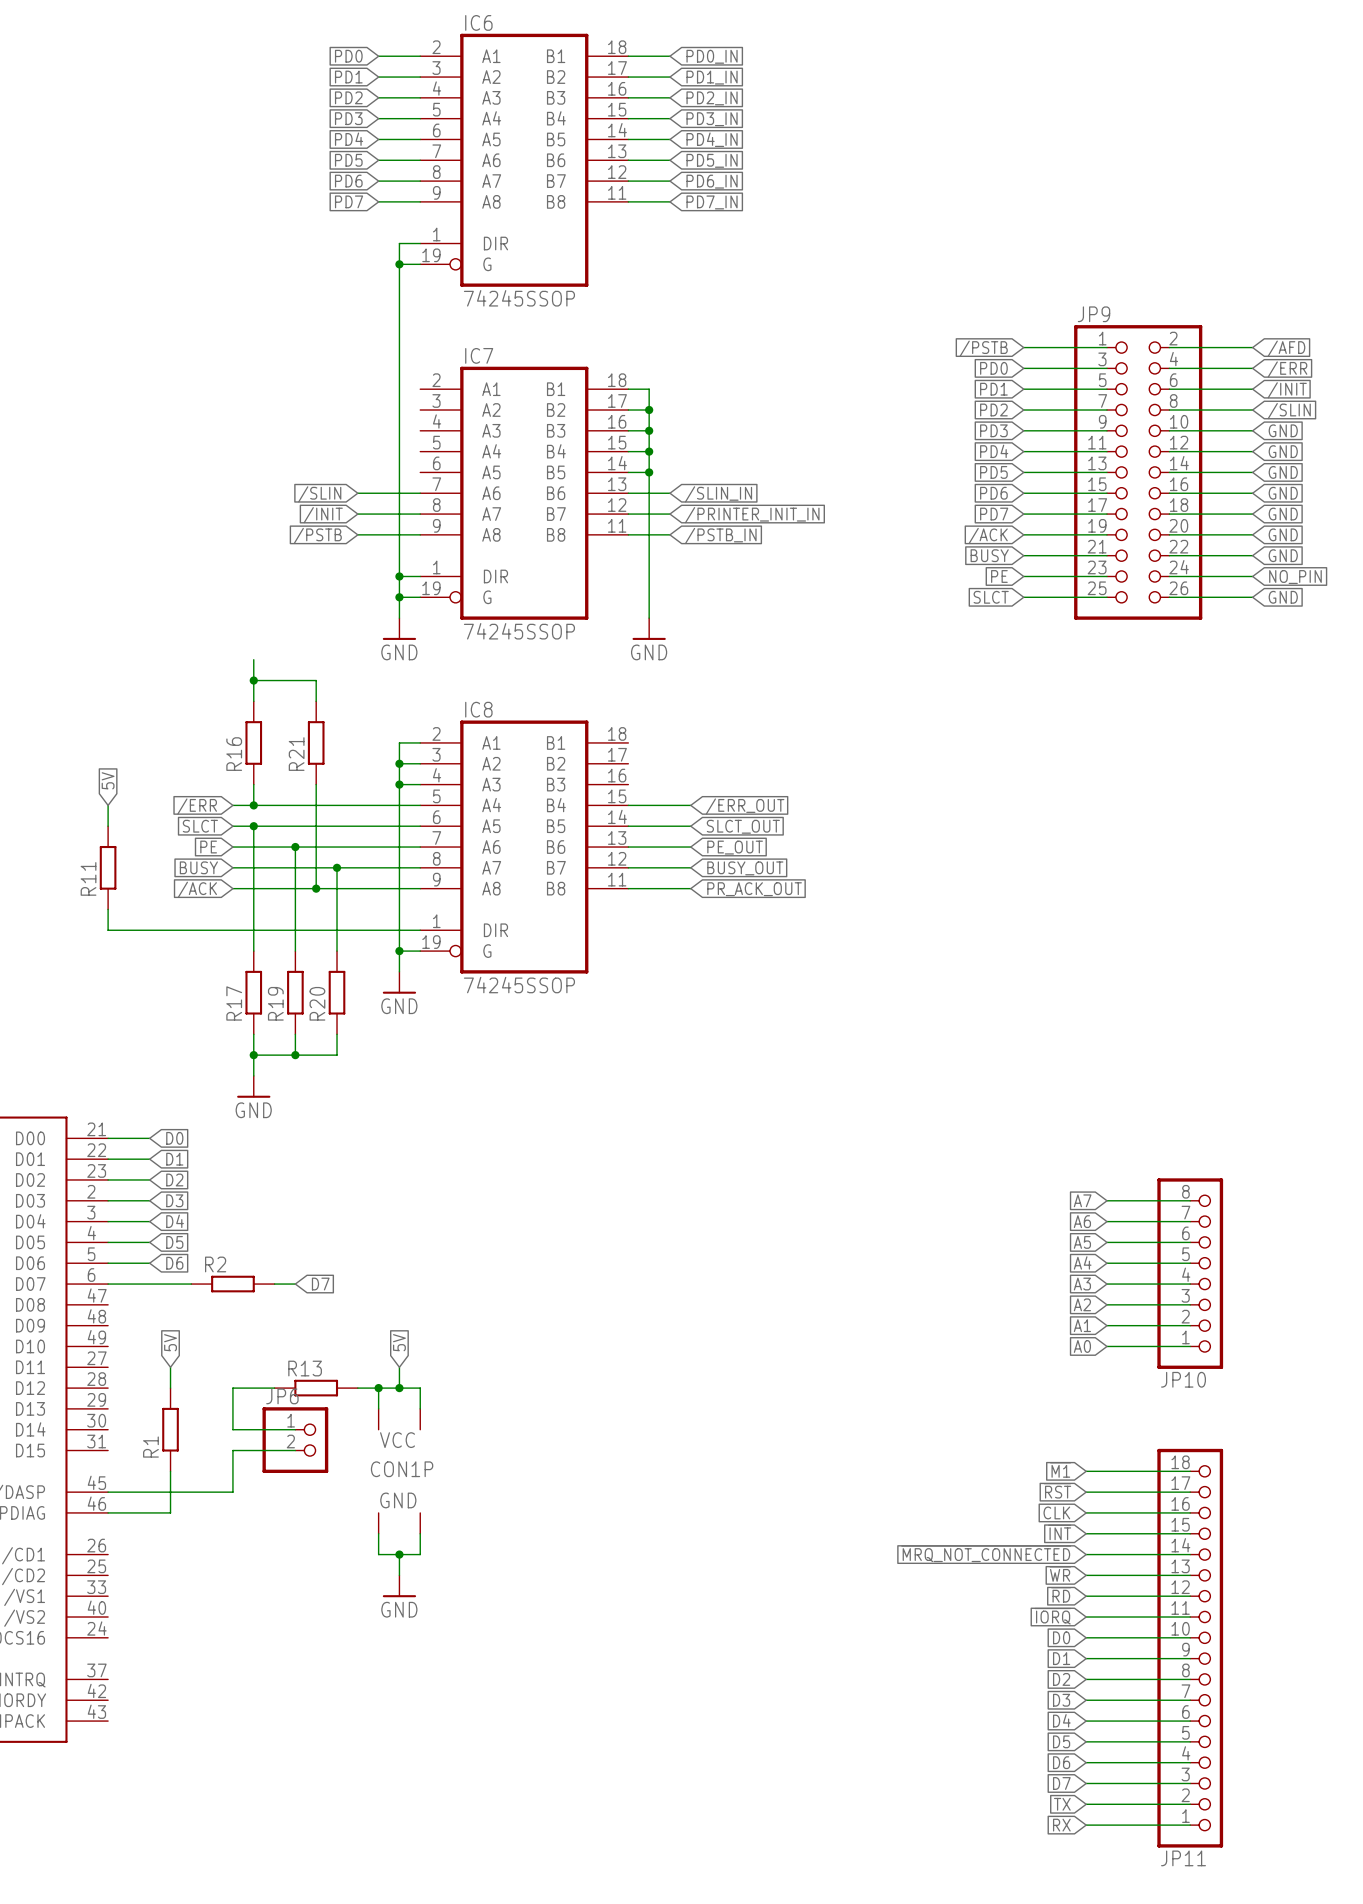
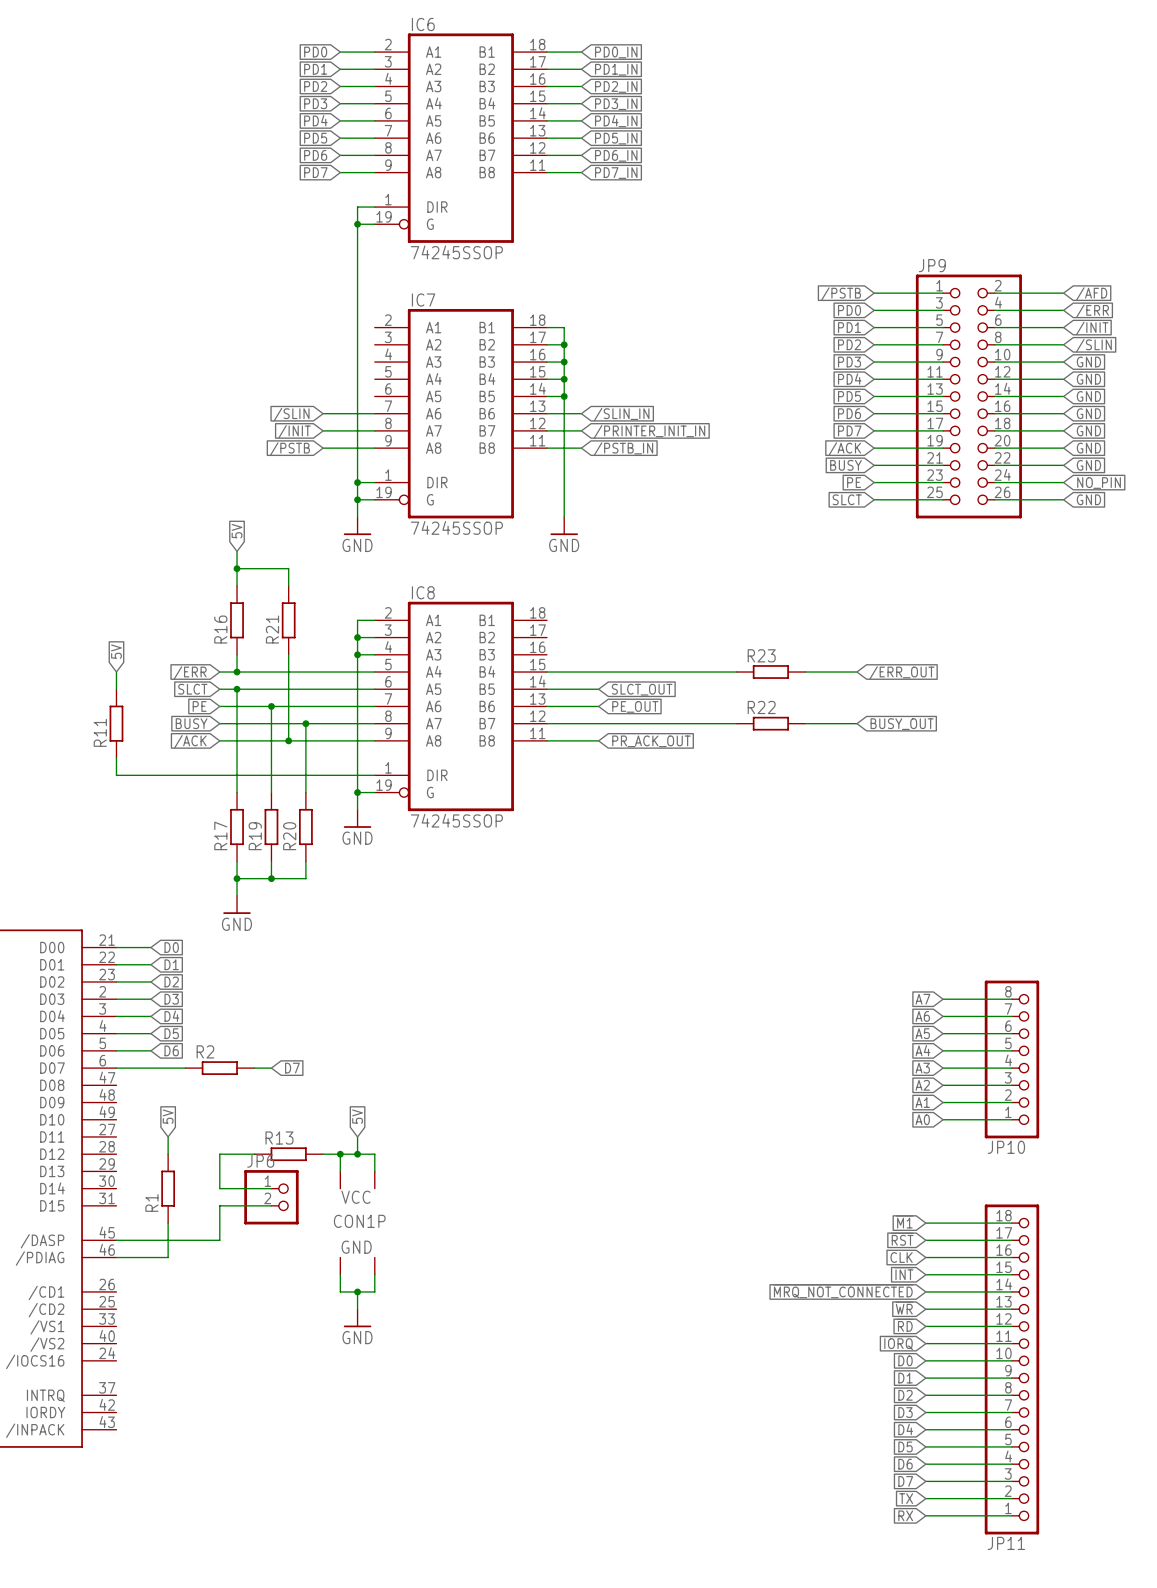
global label: none -> 5V (237, 531)
wire: none -> (598, 672) (736, 672)
R23: none -> (770, 672)
wire: none -> (805, 672) (856, 672)
global label: /ERR_OUT (745, 806) -> none
global label: none -> /ERR_OUT (901, 672)
wire: none -> (598, 723) (736, 723)
R22: none -> (770, 723)
wire: none -> (805, 723) (856, 723)
global label: BUSY_OUT (745, 868) -> none
global label: none -> BUSY_OUT (902, 724)

